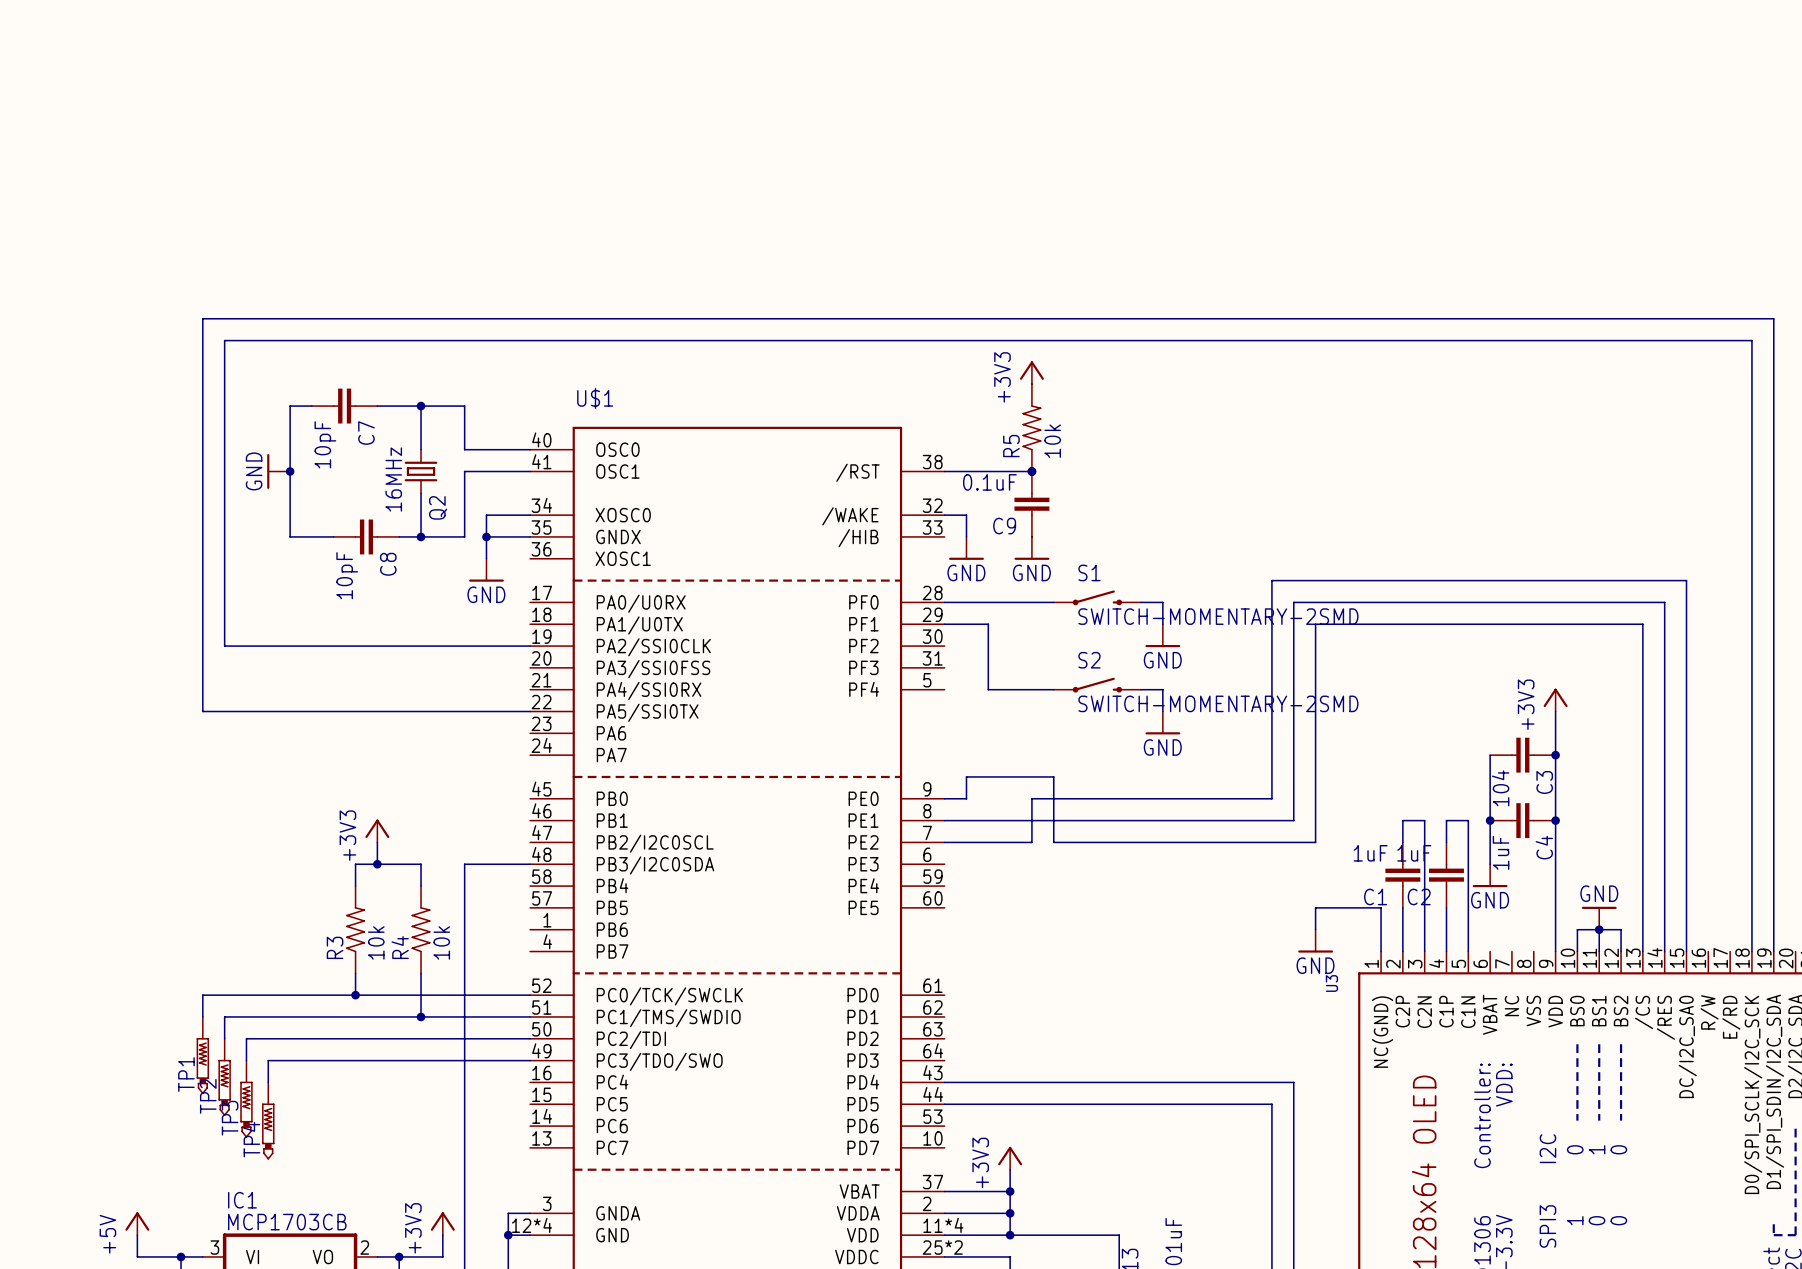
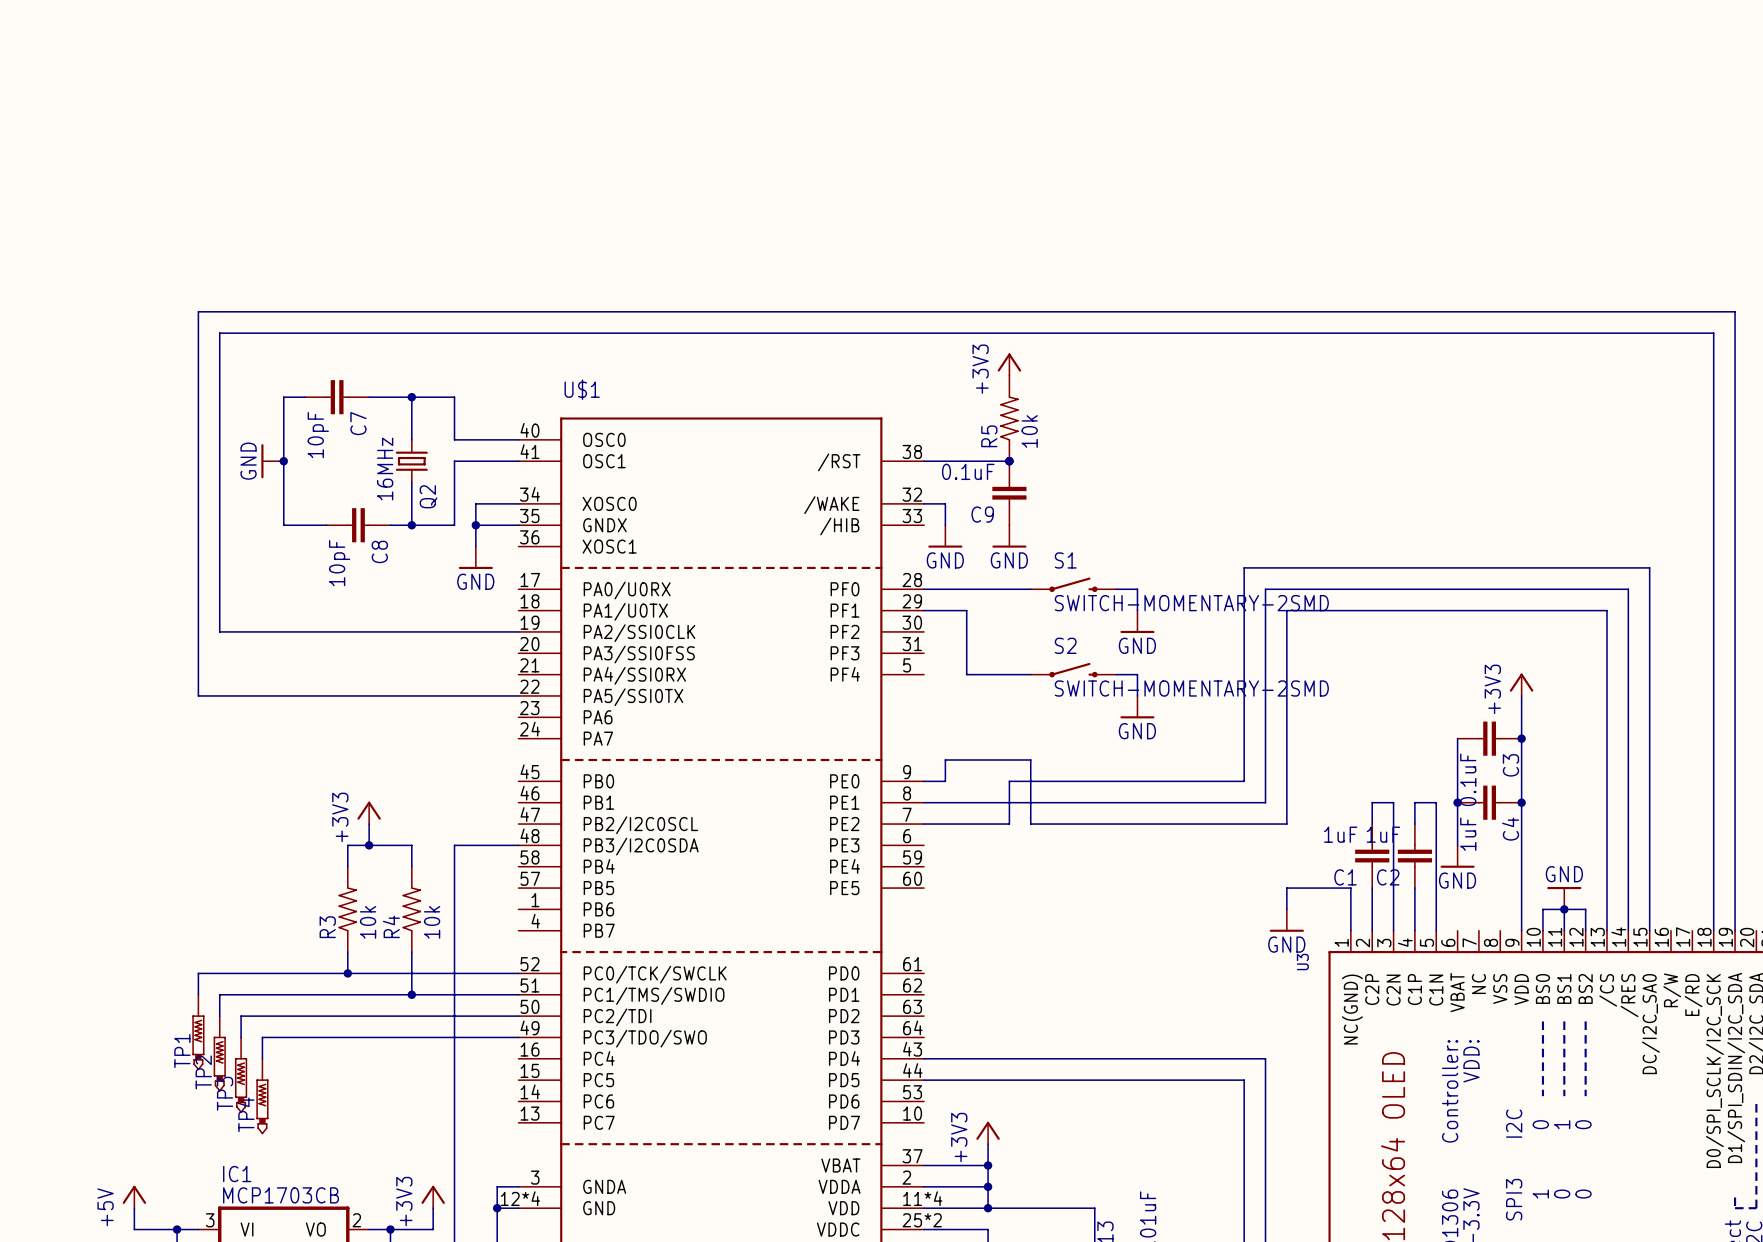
C3 value: 104 (1500, 788) -> 0.1uF (1468, 779)

